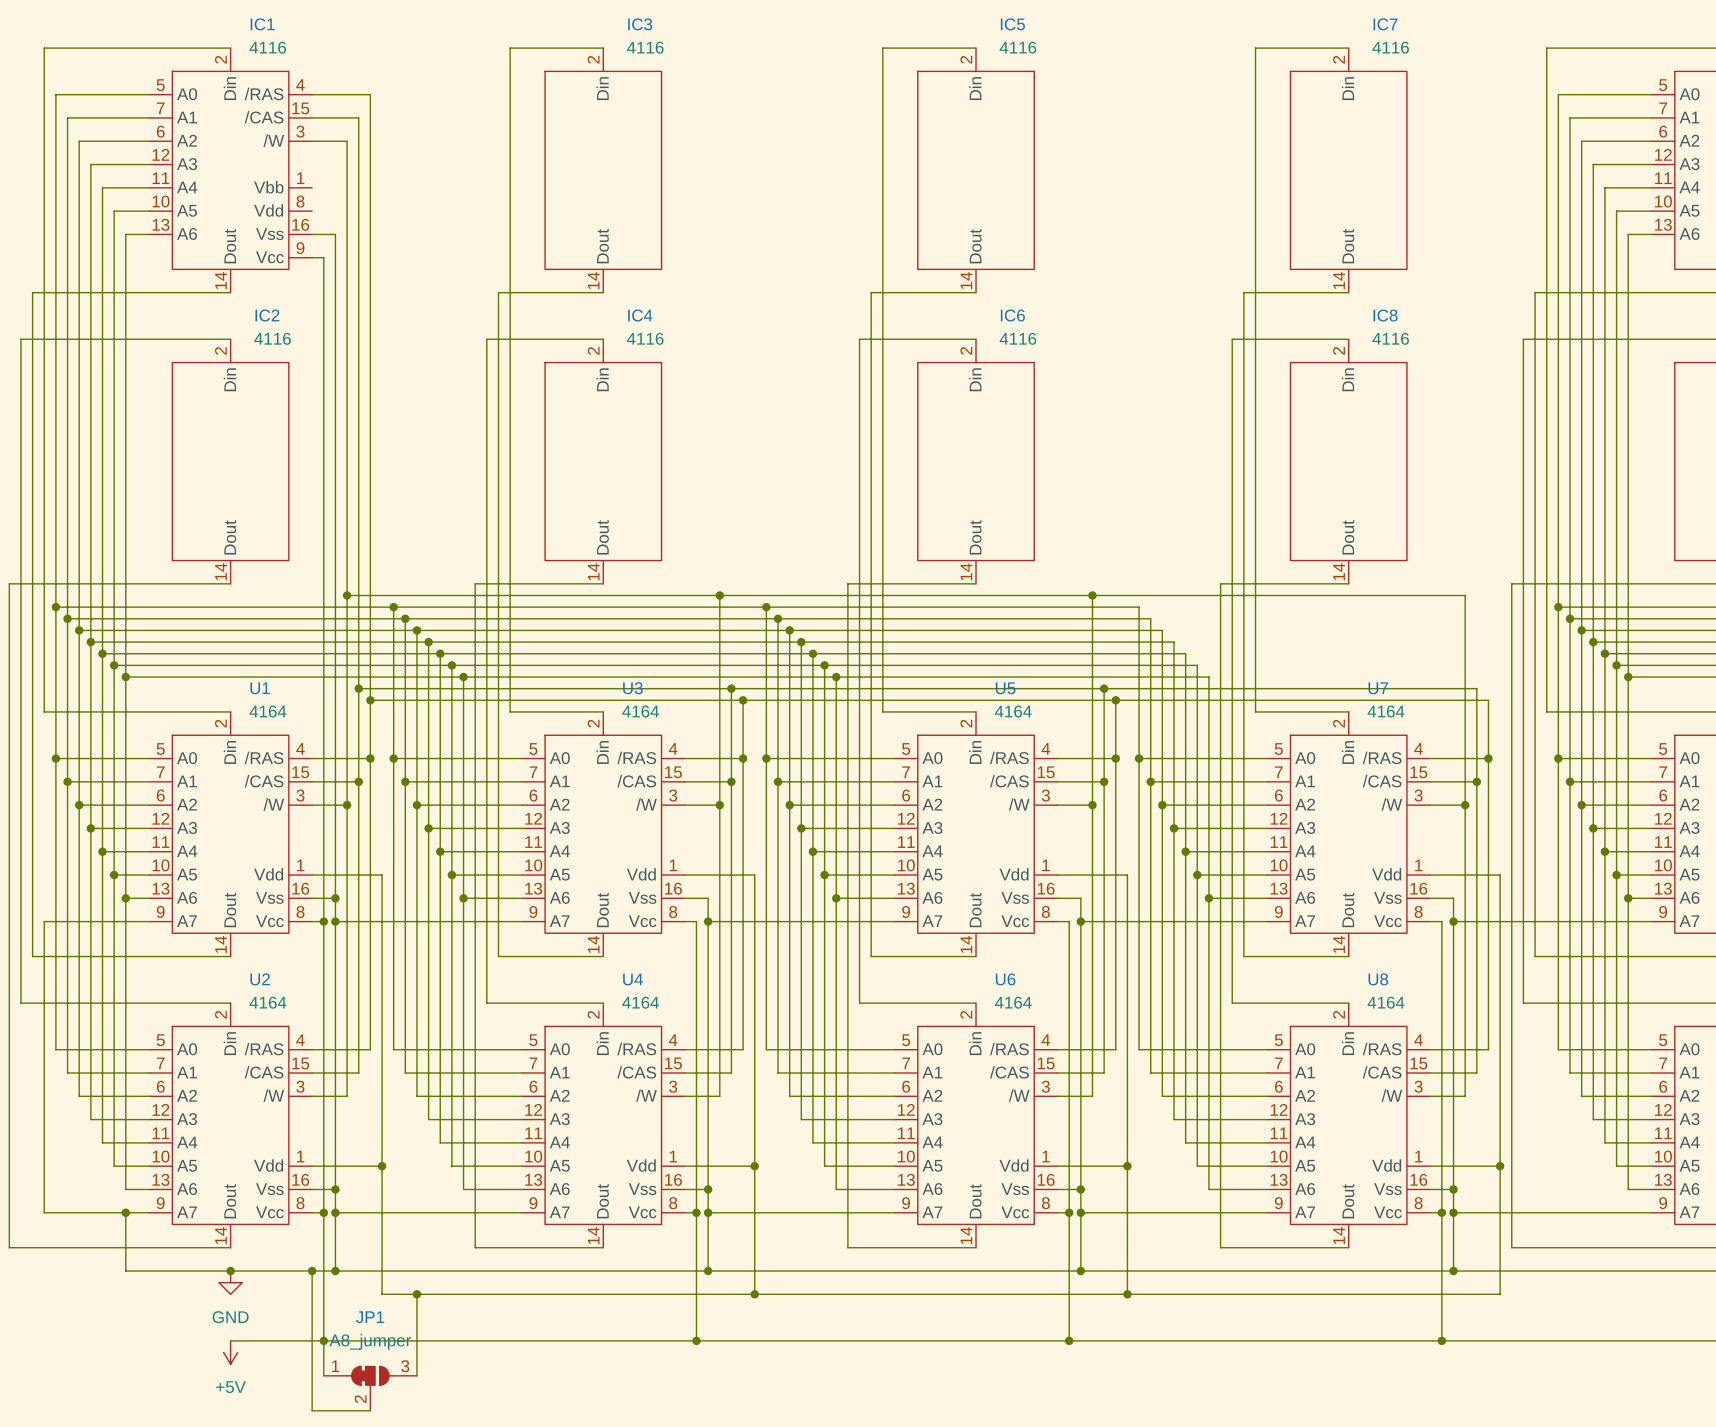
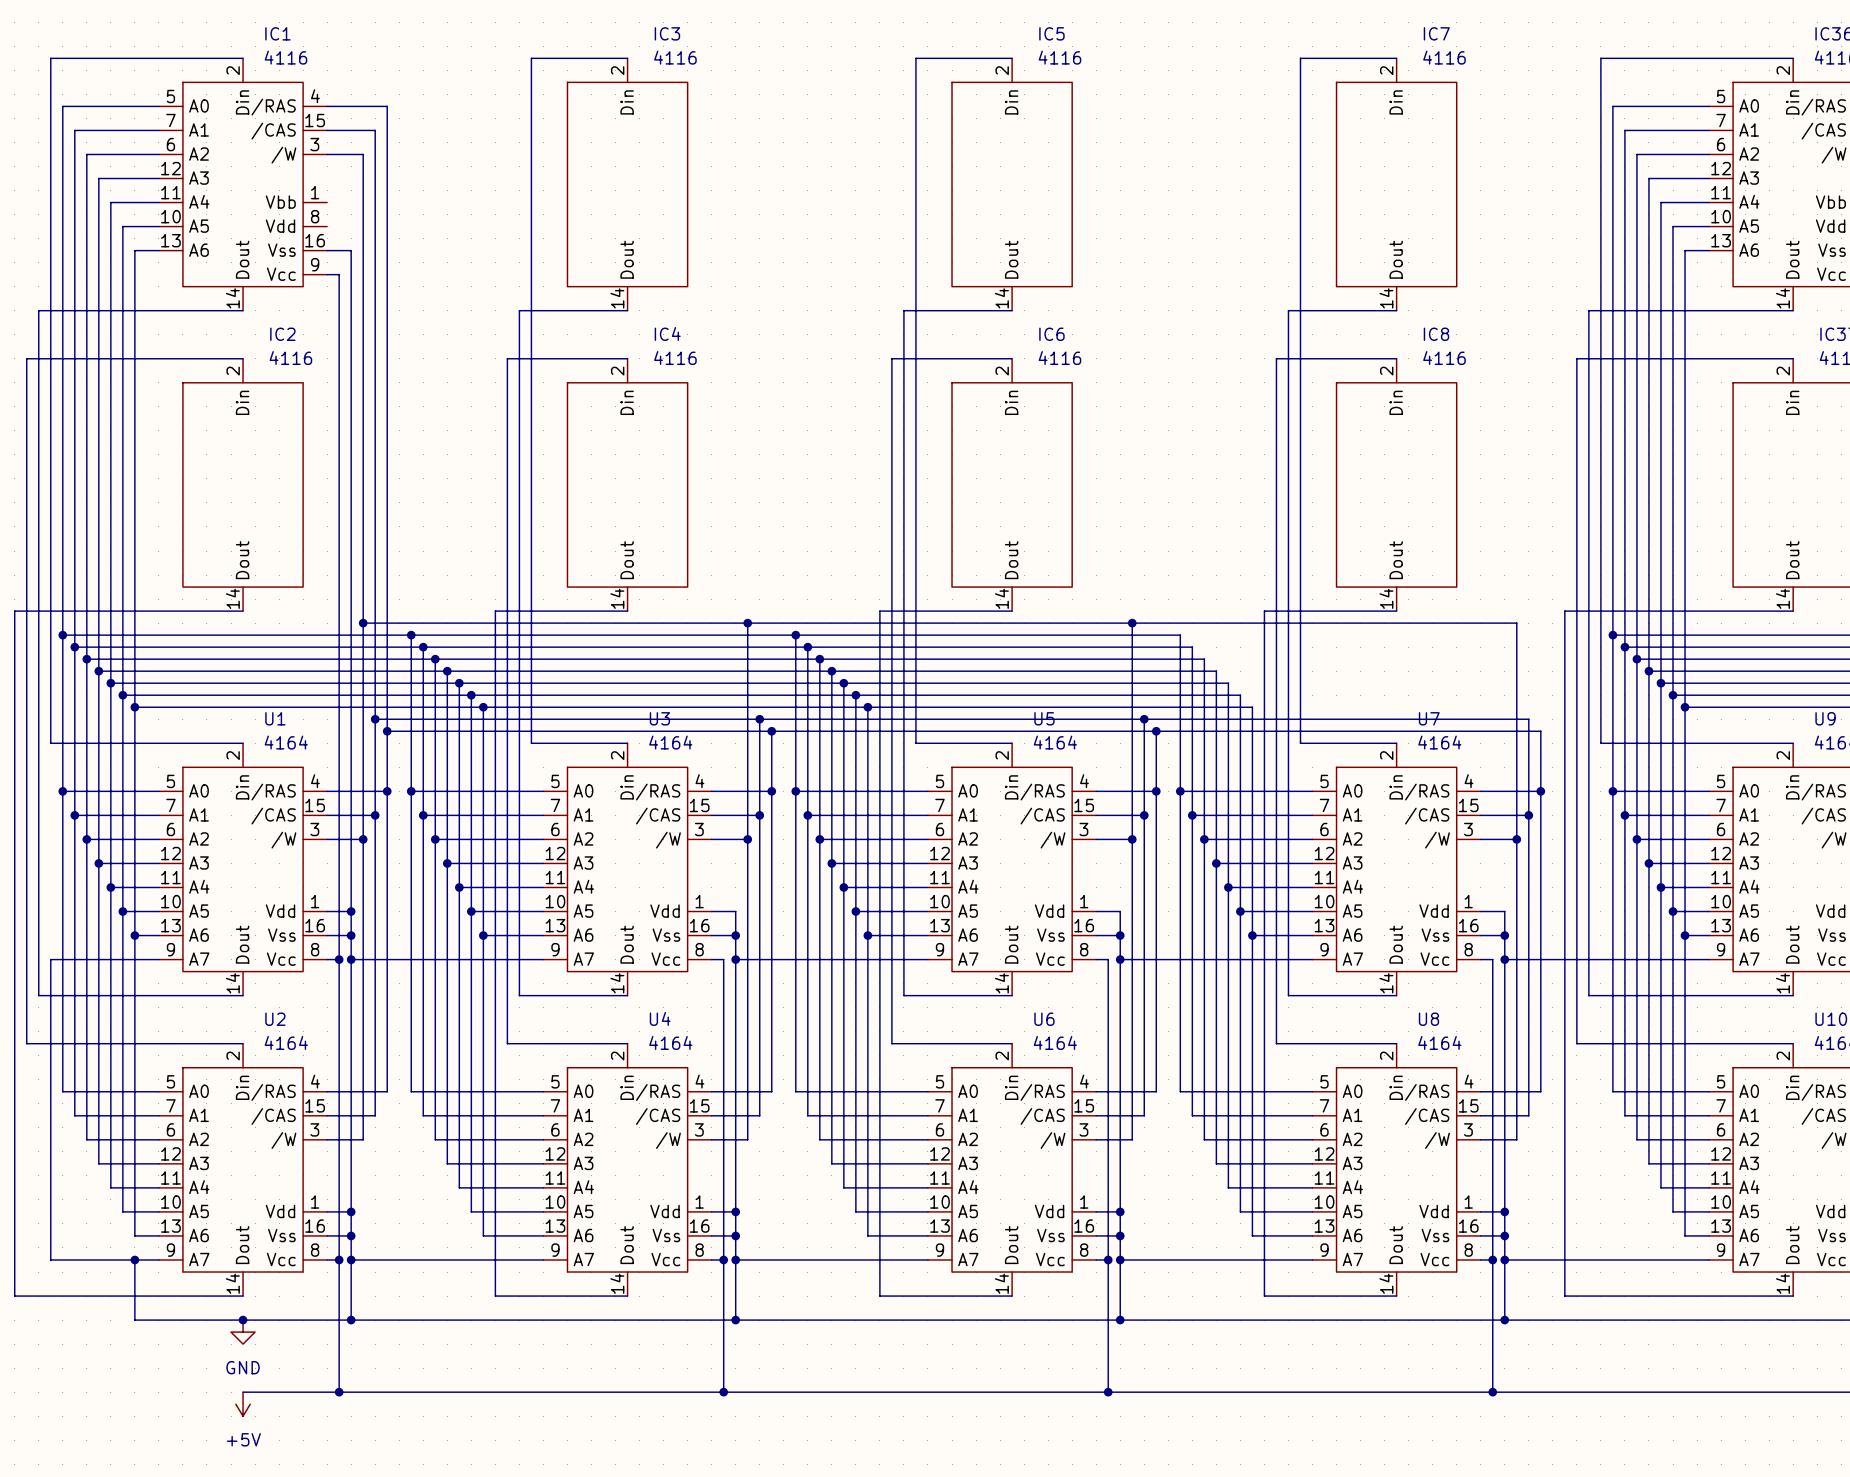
wire: (335, 875) (382, 875) (382, 1294) (1500, 1294) (1500, 875) (1453, 875) -> (1504, 935) (1504, 911)
junction: none -> (351, 911)
wire: (708, 875) (754, 875) (754, 1294) -> (735, 911) (735, 935)
wire: (1080, 875) (1127, 875) (1127, 1294) -> (1120, 911) (1120, 935)
junction: none -> (735, 935)
junction: none -> (1120, 935)
junction: none -> (1504, 935)
wire: (335, 1166) (382, 1166) -> none
junction position: (382, 1166) -> (351, 1211)
wire: (708, 1166) (754, 1166) -> none
junction position: (754, 1166) -> (735, 1211)
wire: (1080, 1166) (1127, 1166) -> none
junction position: (1127, 1166) -> (1120, 1211)
wire: (1453, 1166) (1500, 1166) -> none
junction position: (1500, 1166) -> (1504, 1211)
wire: (312, 1271) (312, 1410) (370, 1410) -> none
junction: (312, 1271) -> none
wire: (416, 1294) (416, 1375) -> none
junction: (416, 1294) -> none
junction: (754, 1294) -> none
junction: (1127, 1294) -> none
wire: (323, 1340) (323, 1375) -> none
JP1: A8_jumper (370, 1388) -> none

